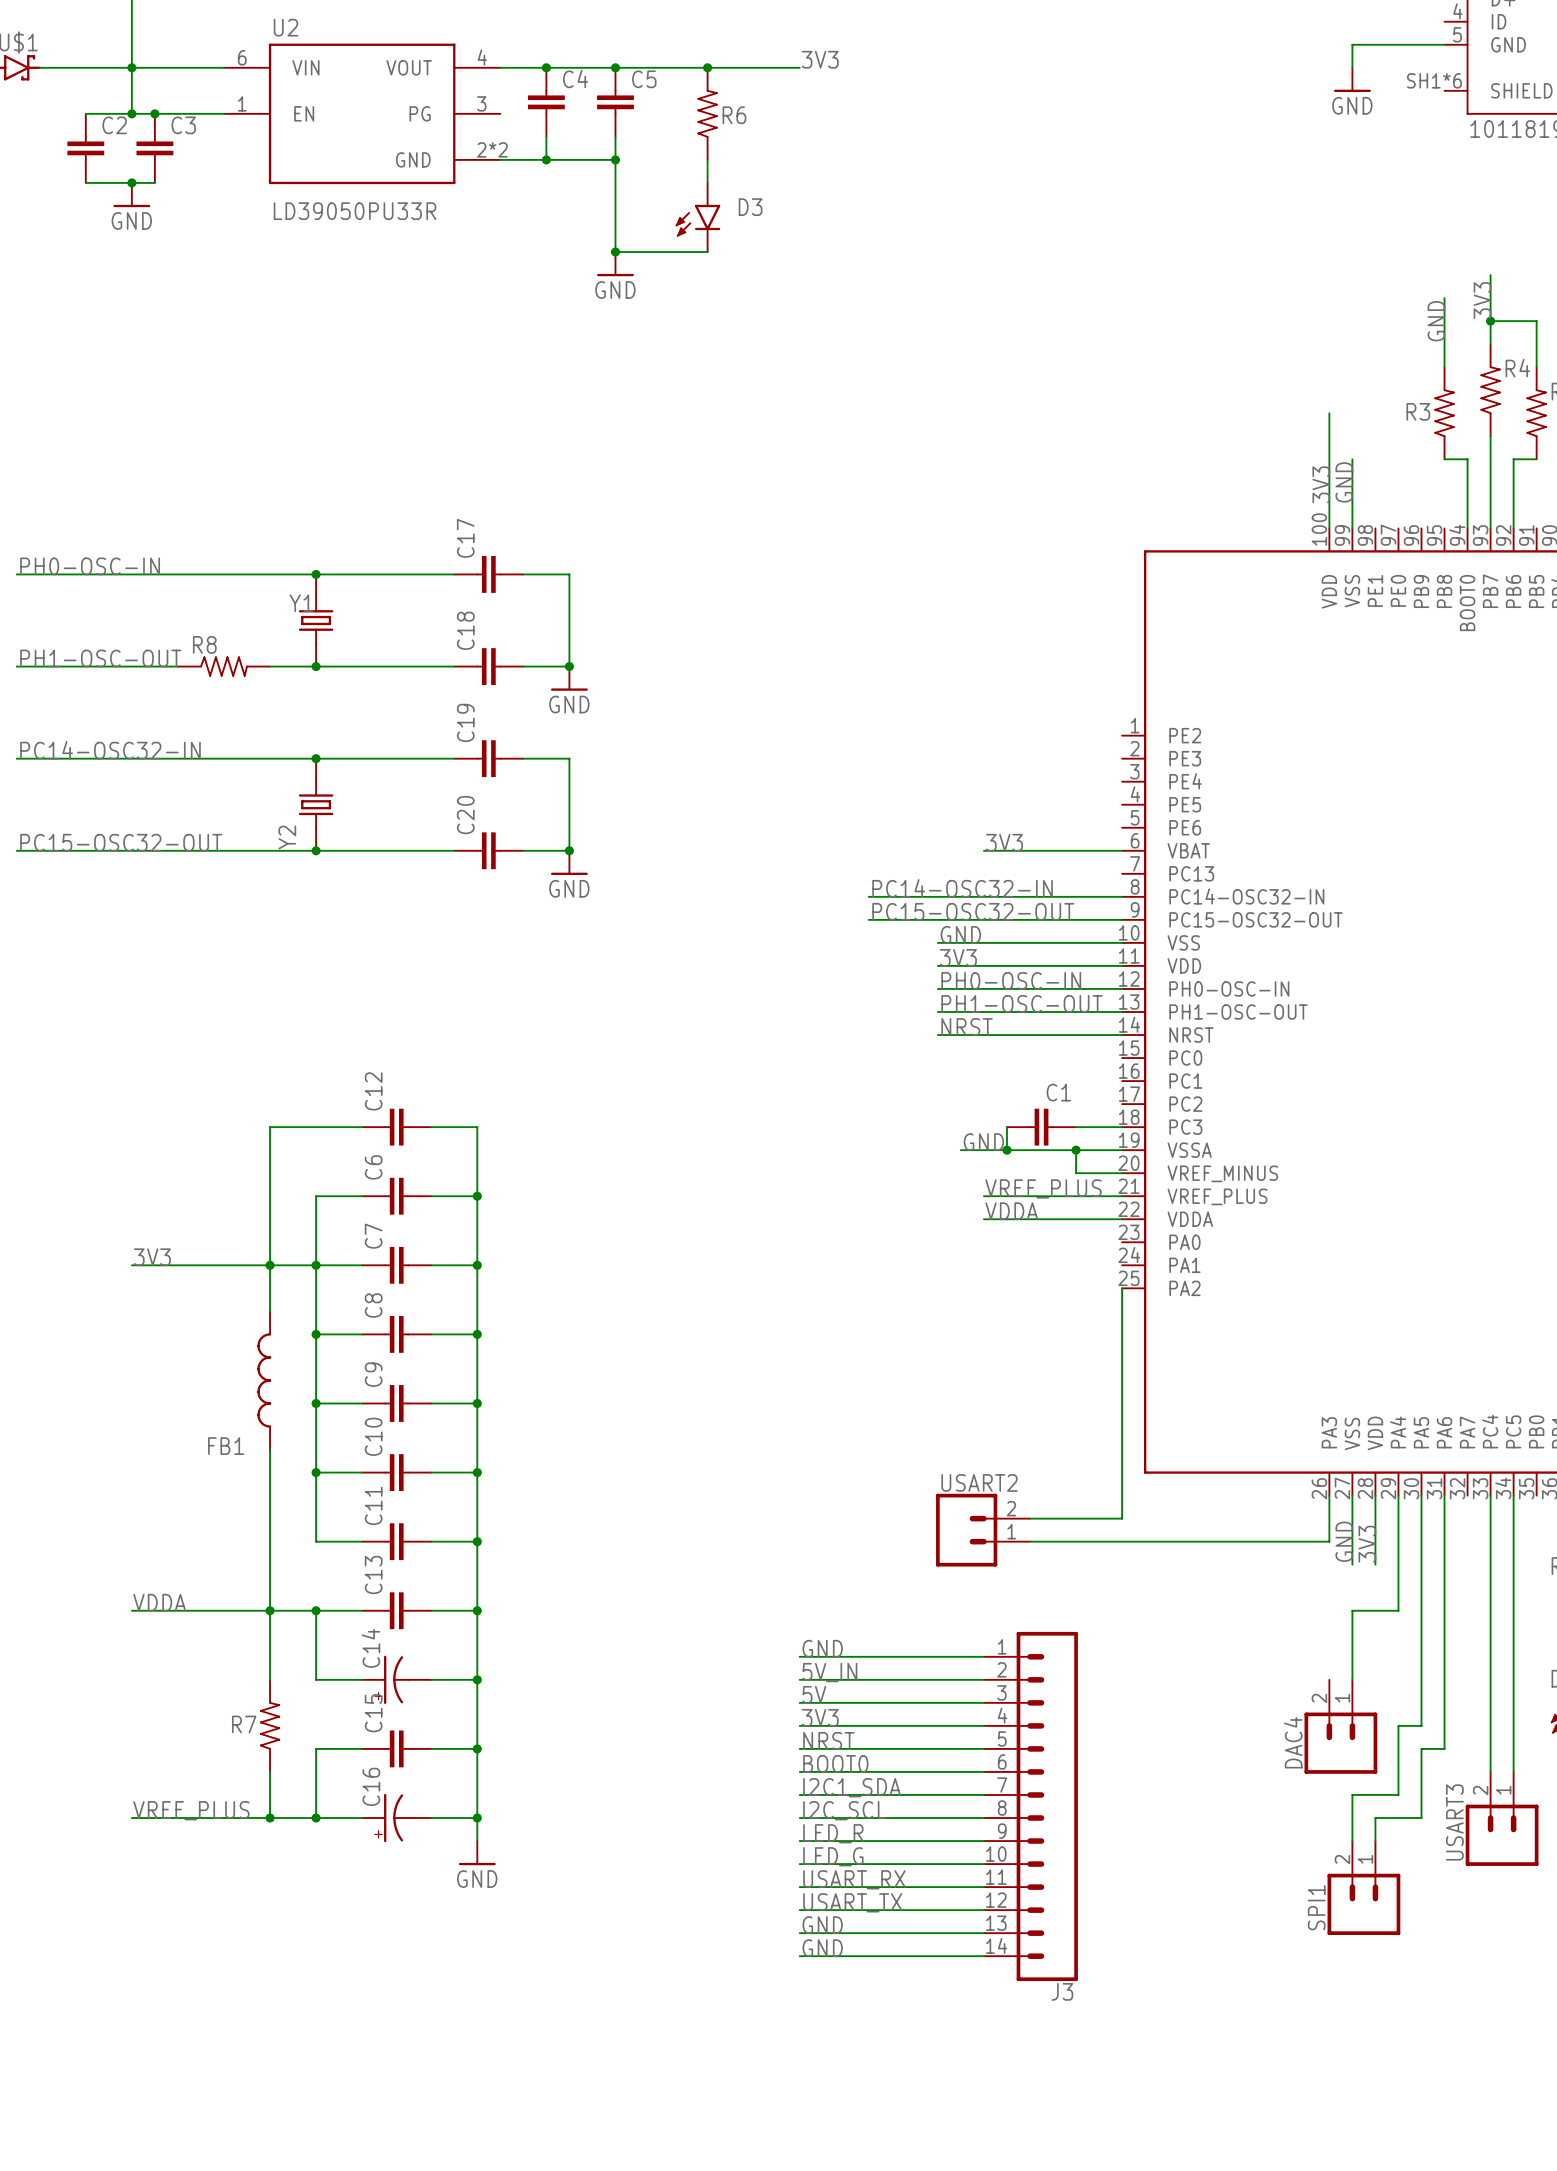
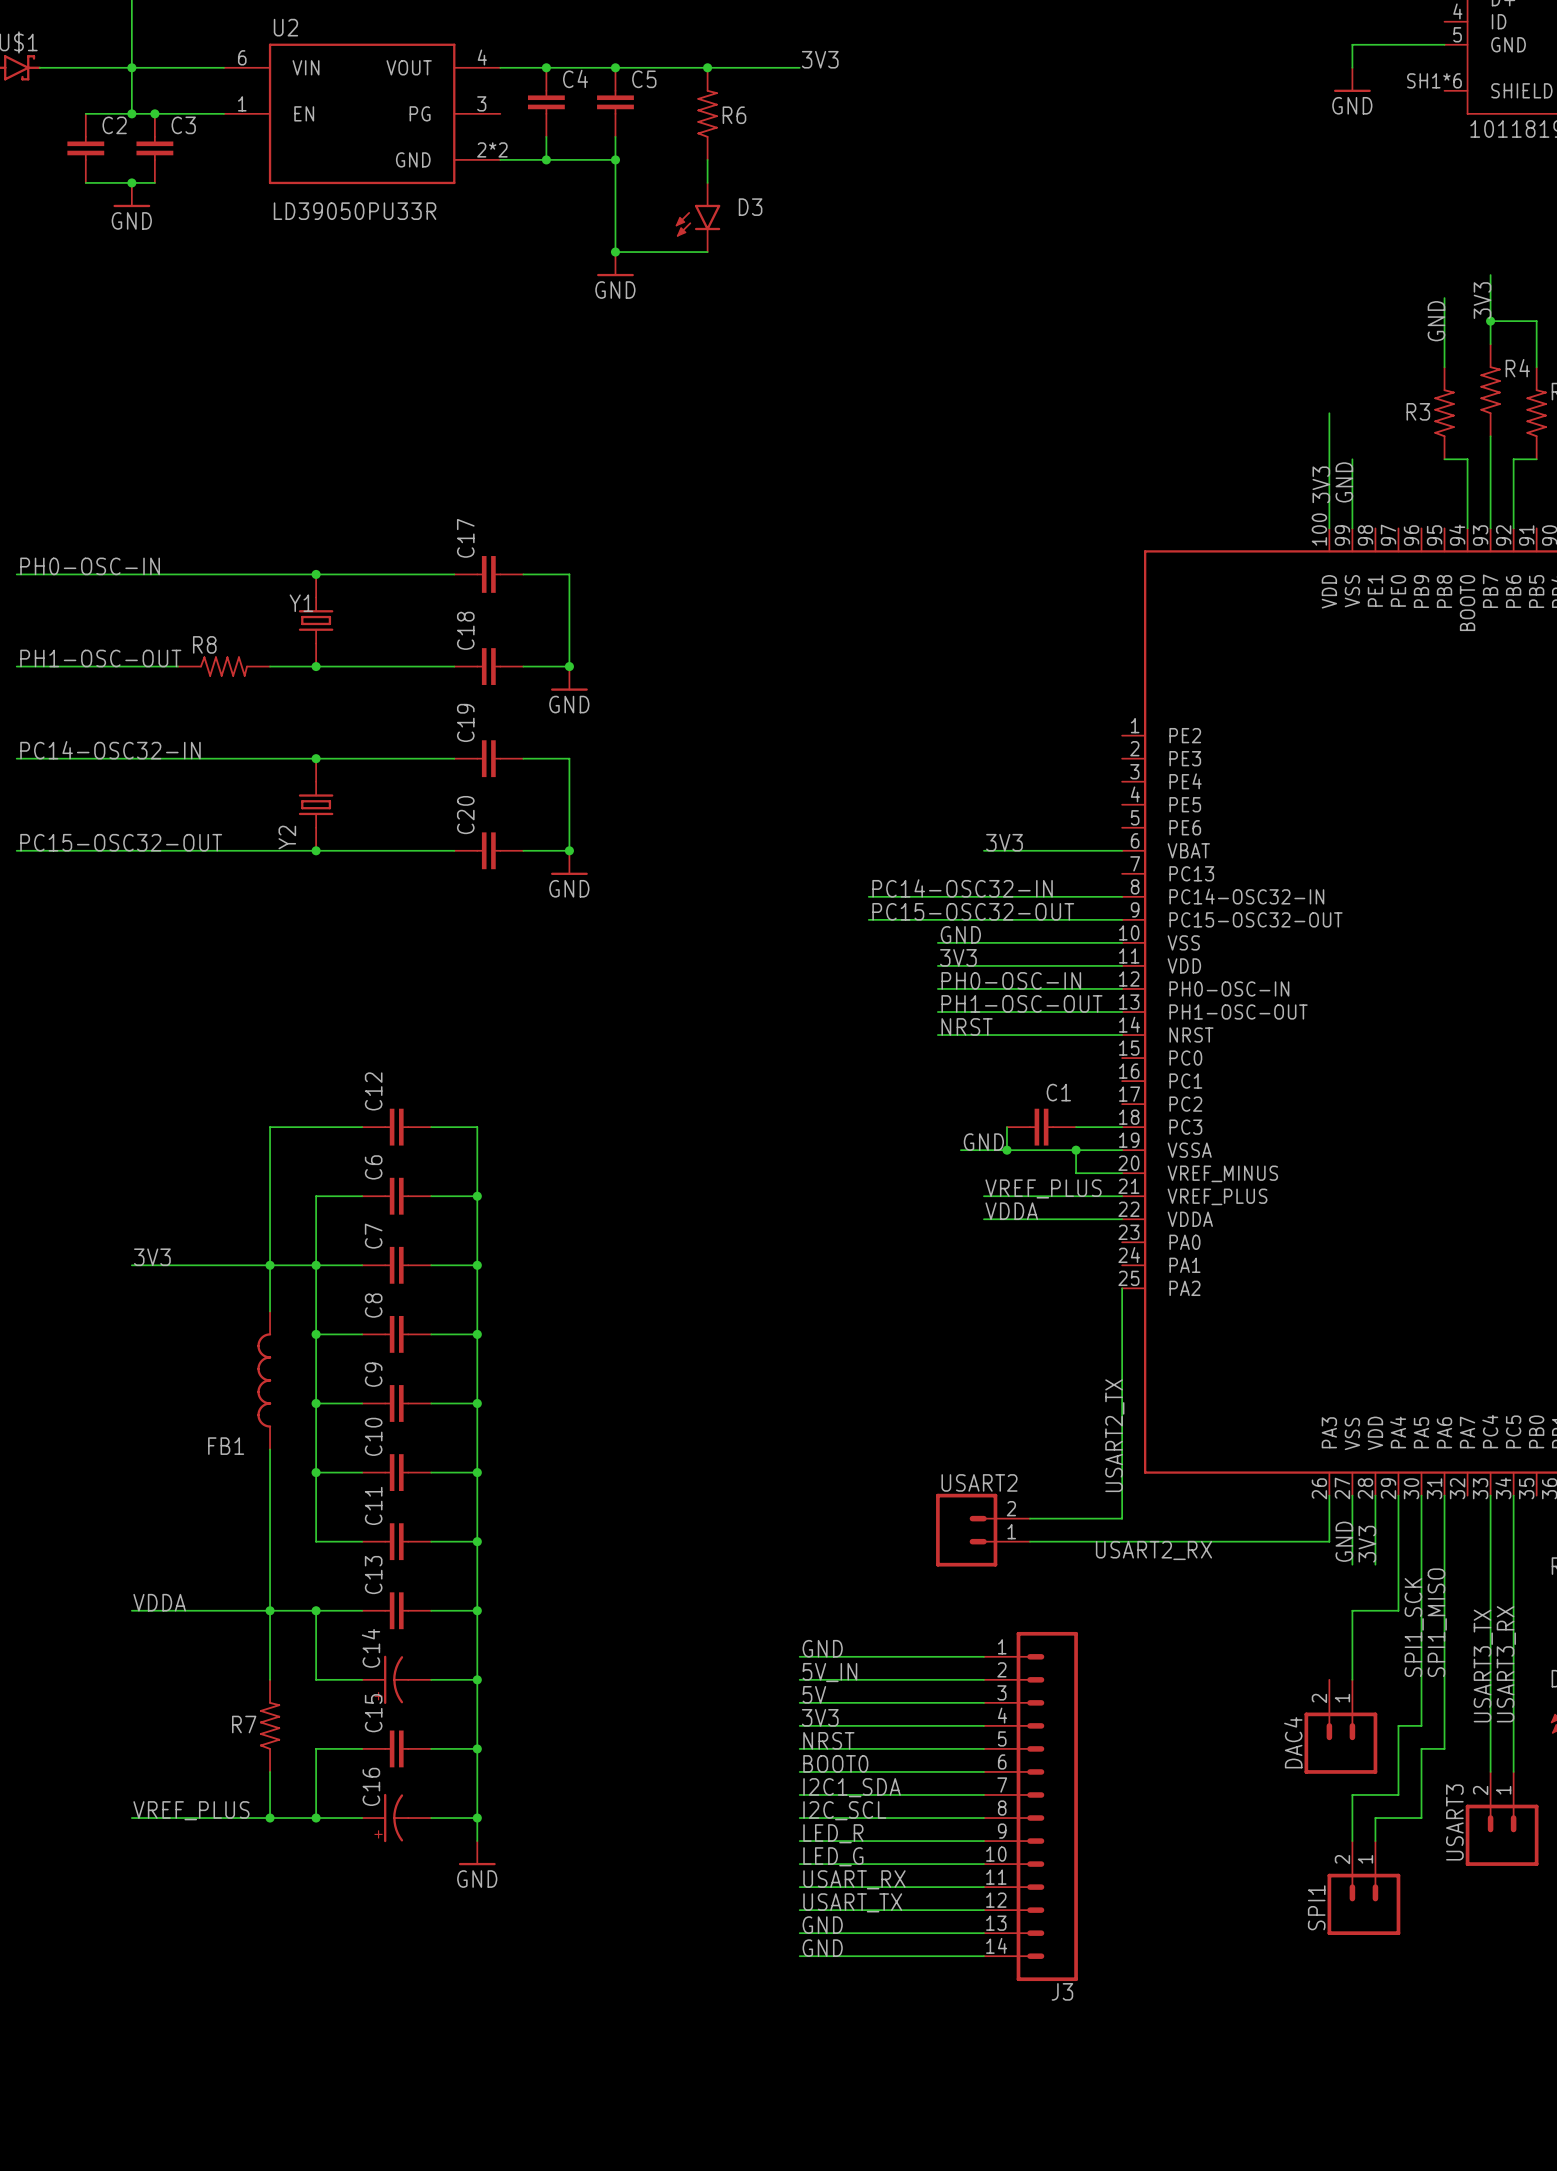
label: none -> USART2_TX (1114, 1435)
label: none -> USART2_RX (1153, 1550)
label: none -> SPI1_MISO (1437, 1622)
label: none -> SPI1_SCK (1414, 1627)
label: none -> USART3_RX (1506, 1664)
label: none -> USART3_TX (1483, 1665)

